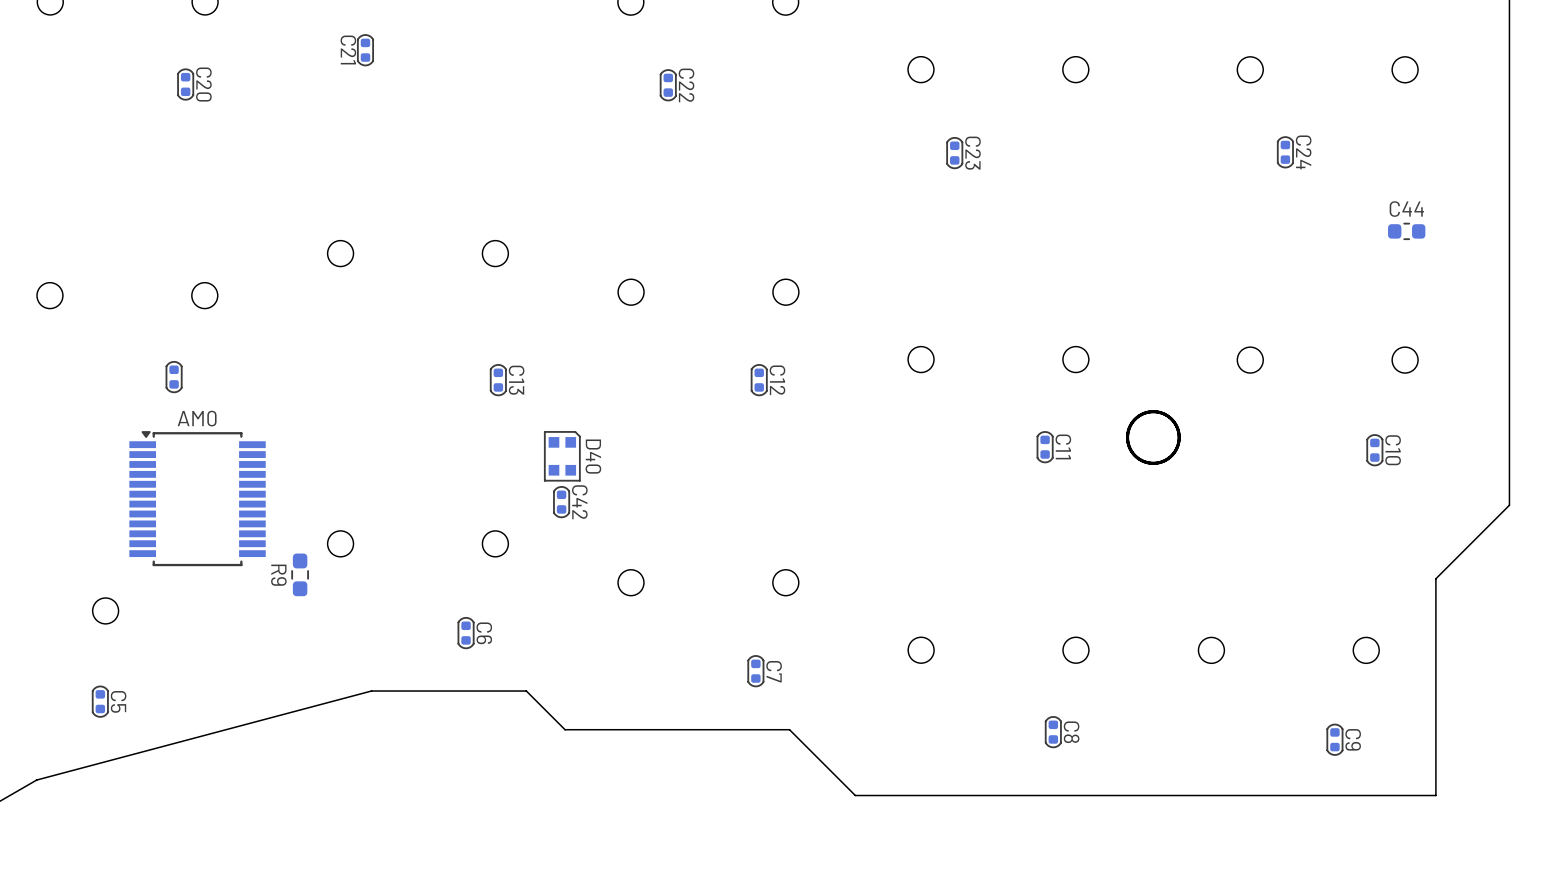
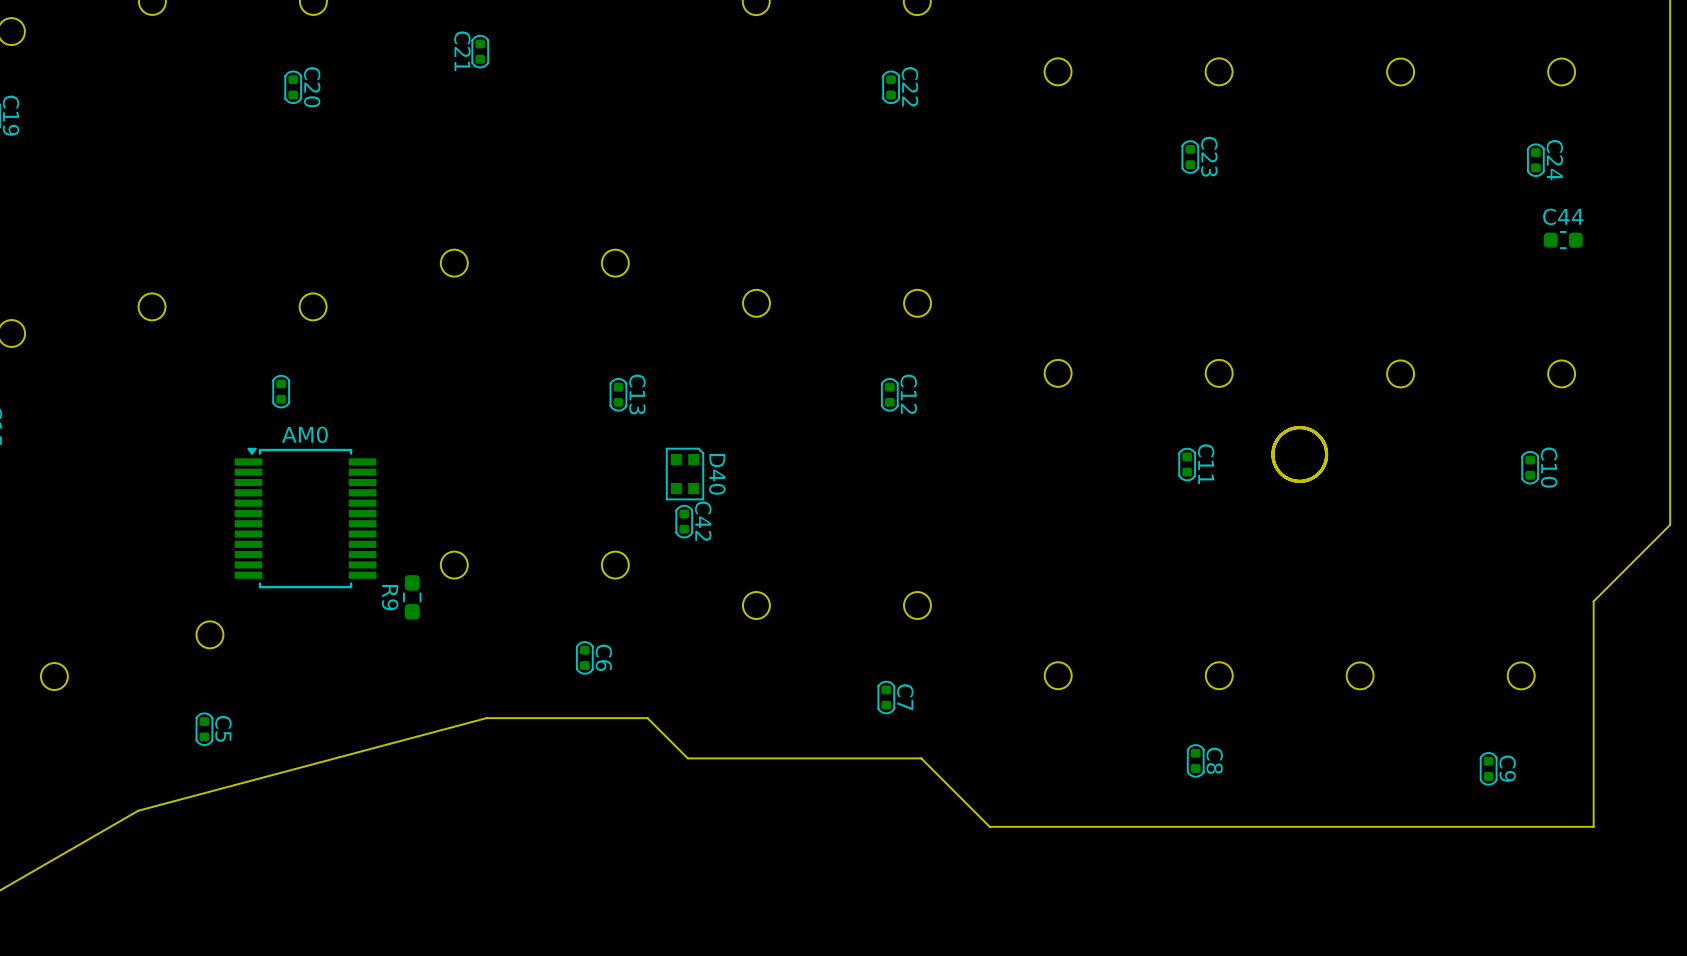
C22 position: (668, 85) -> (891, 87)
C24 position: (1285, 152) -> (1535, 160)
C23 position: (954, 153) -> (1190, 157)

